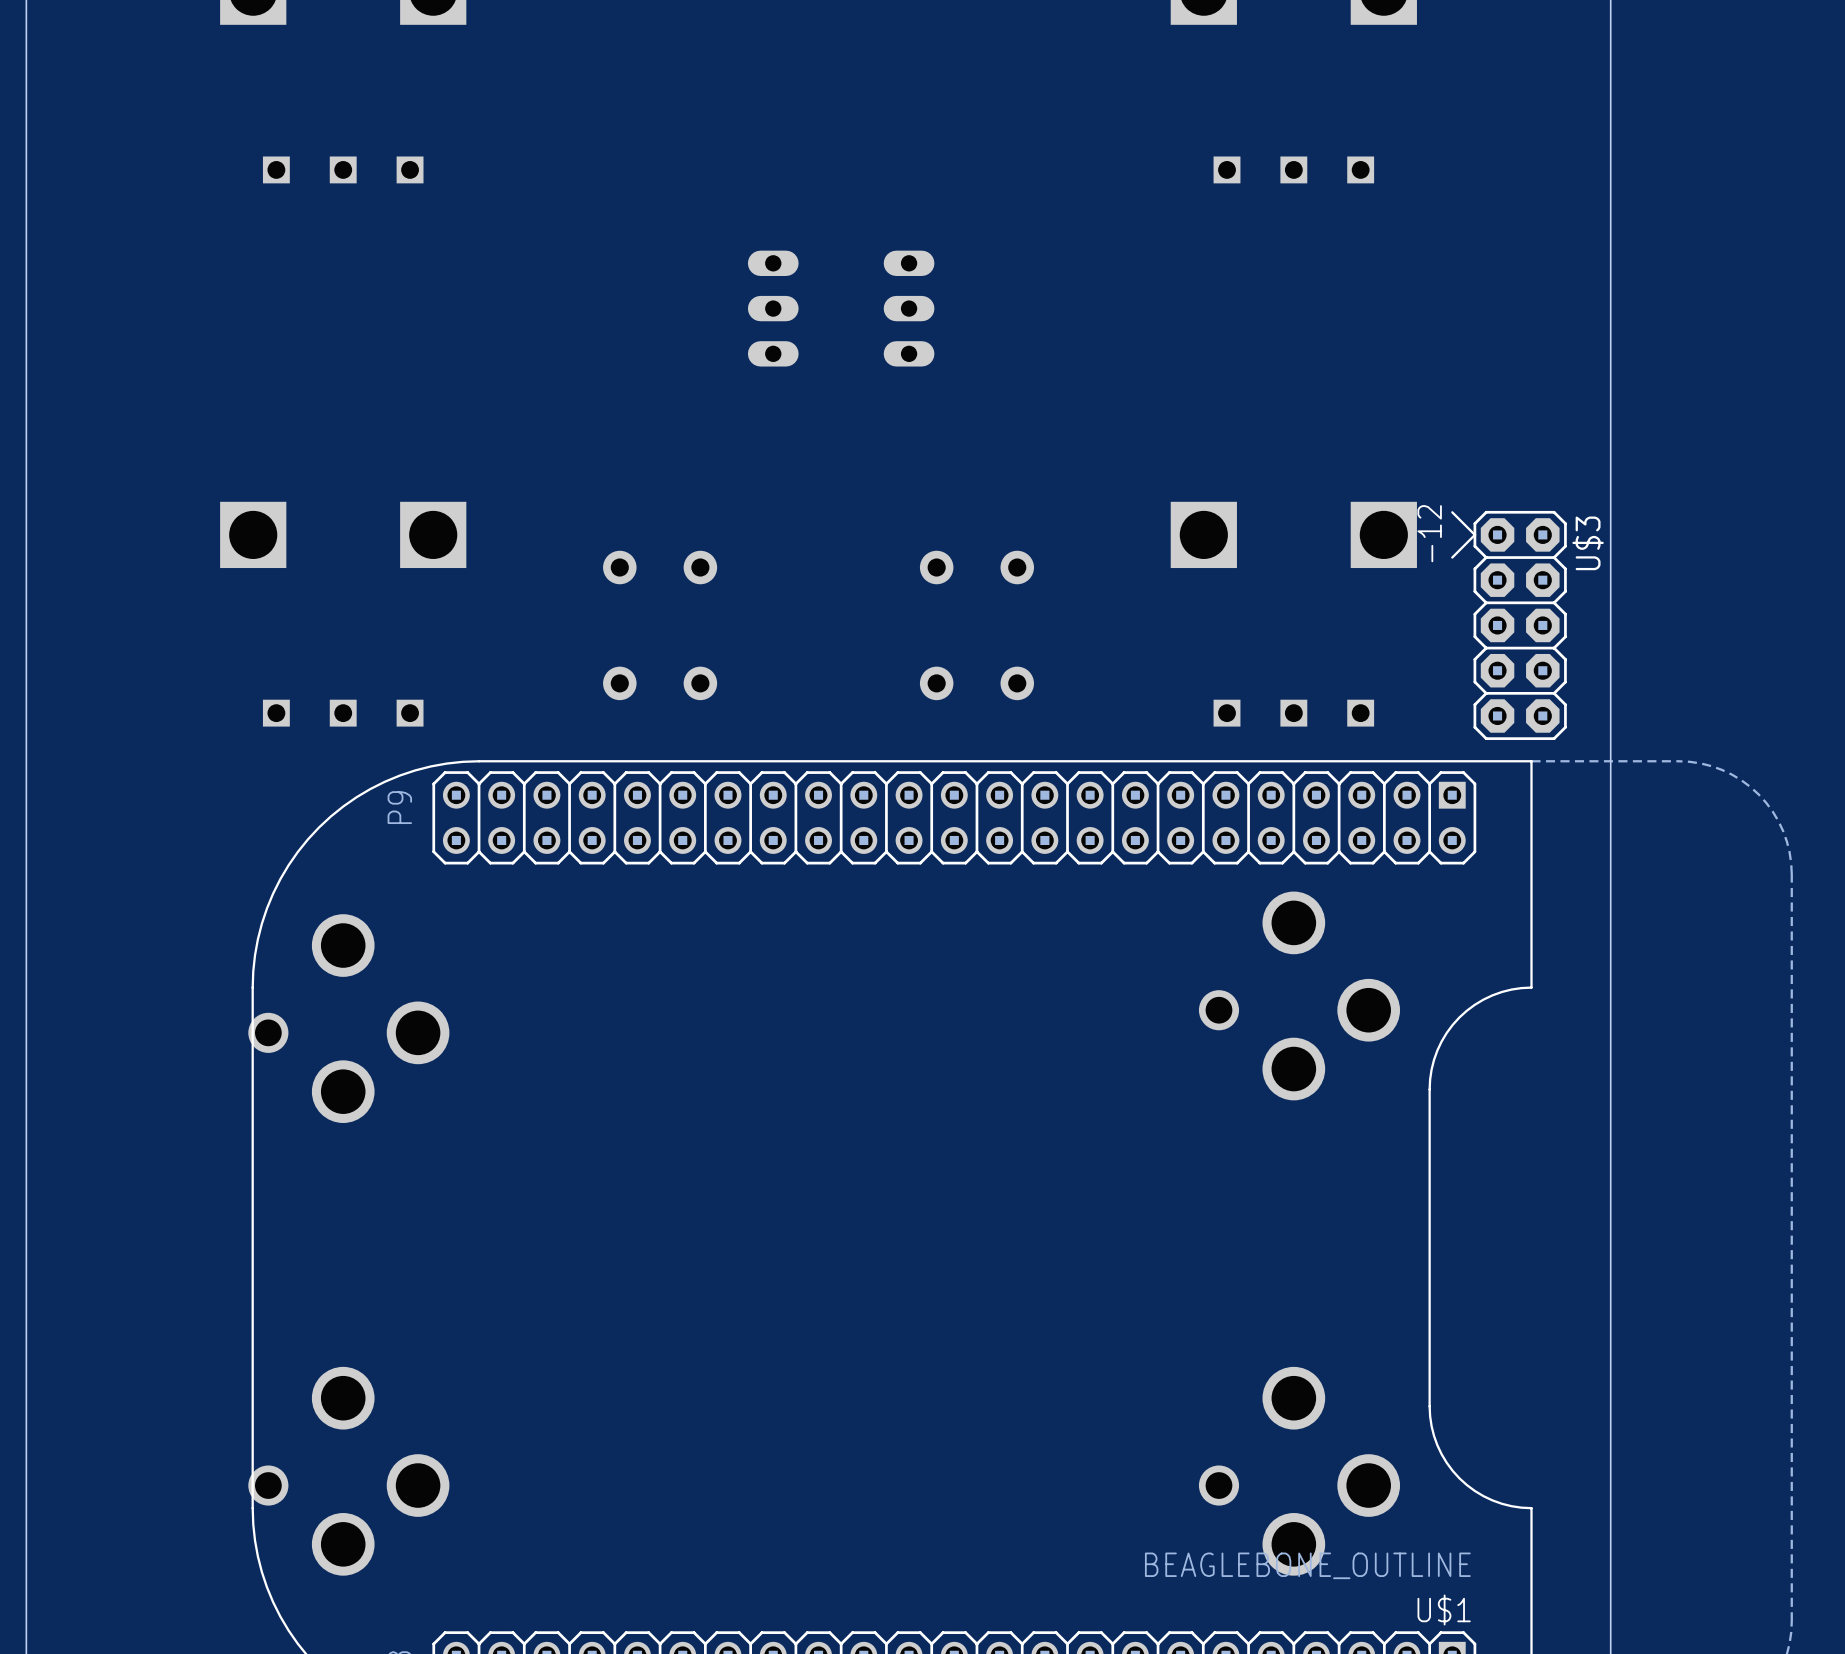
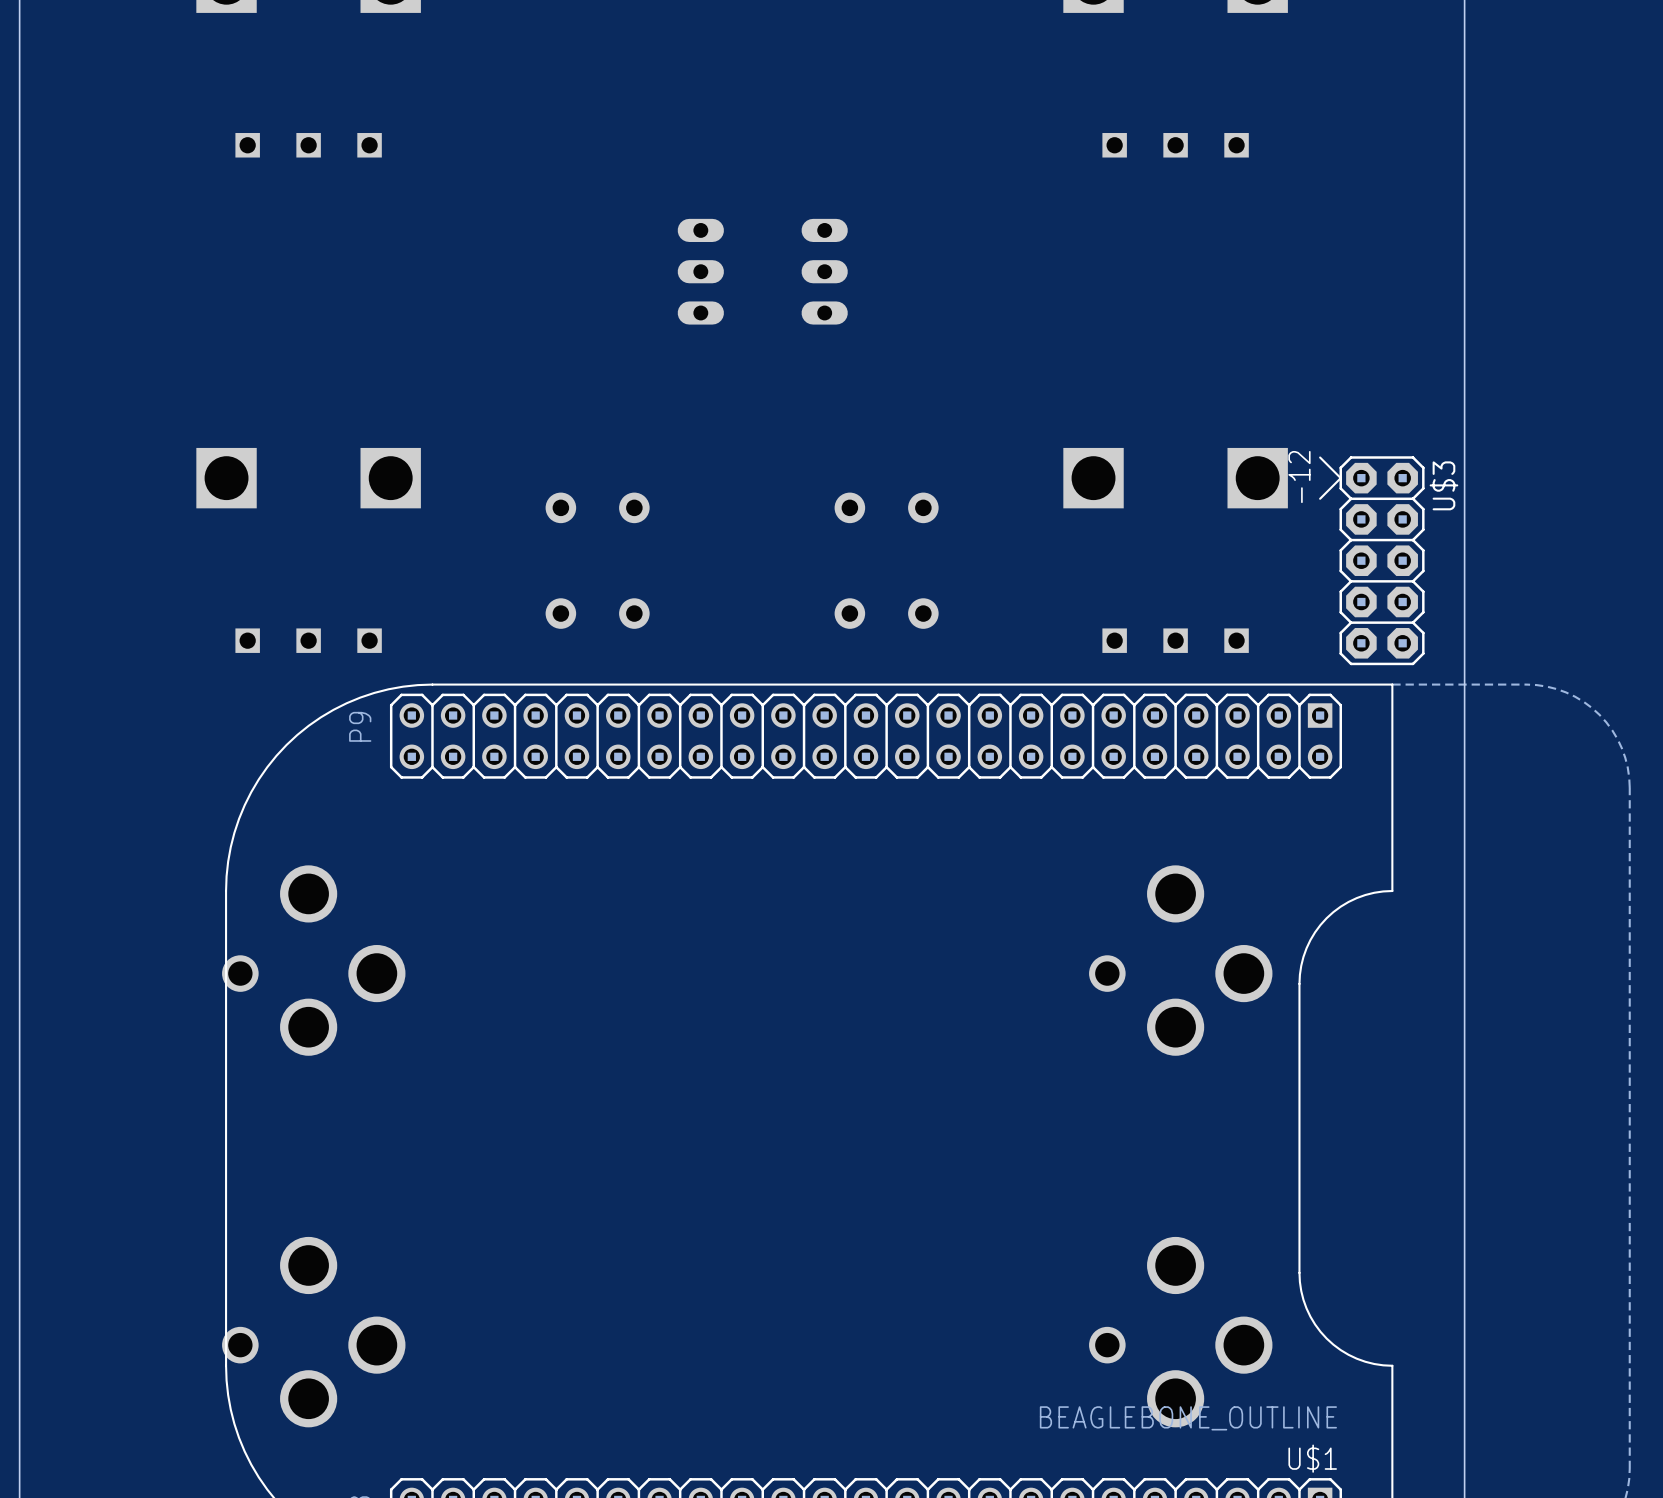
part position: (1299, 995) -> (1180, 960)
part position: (348, 1018) -> (313, 960)

